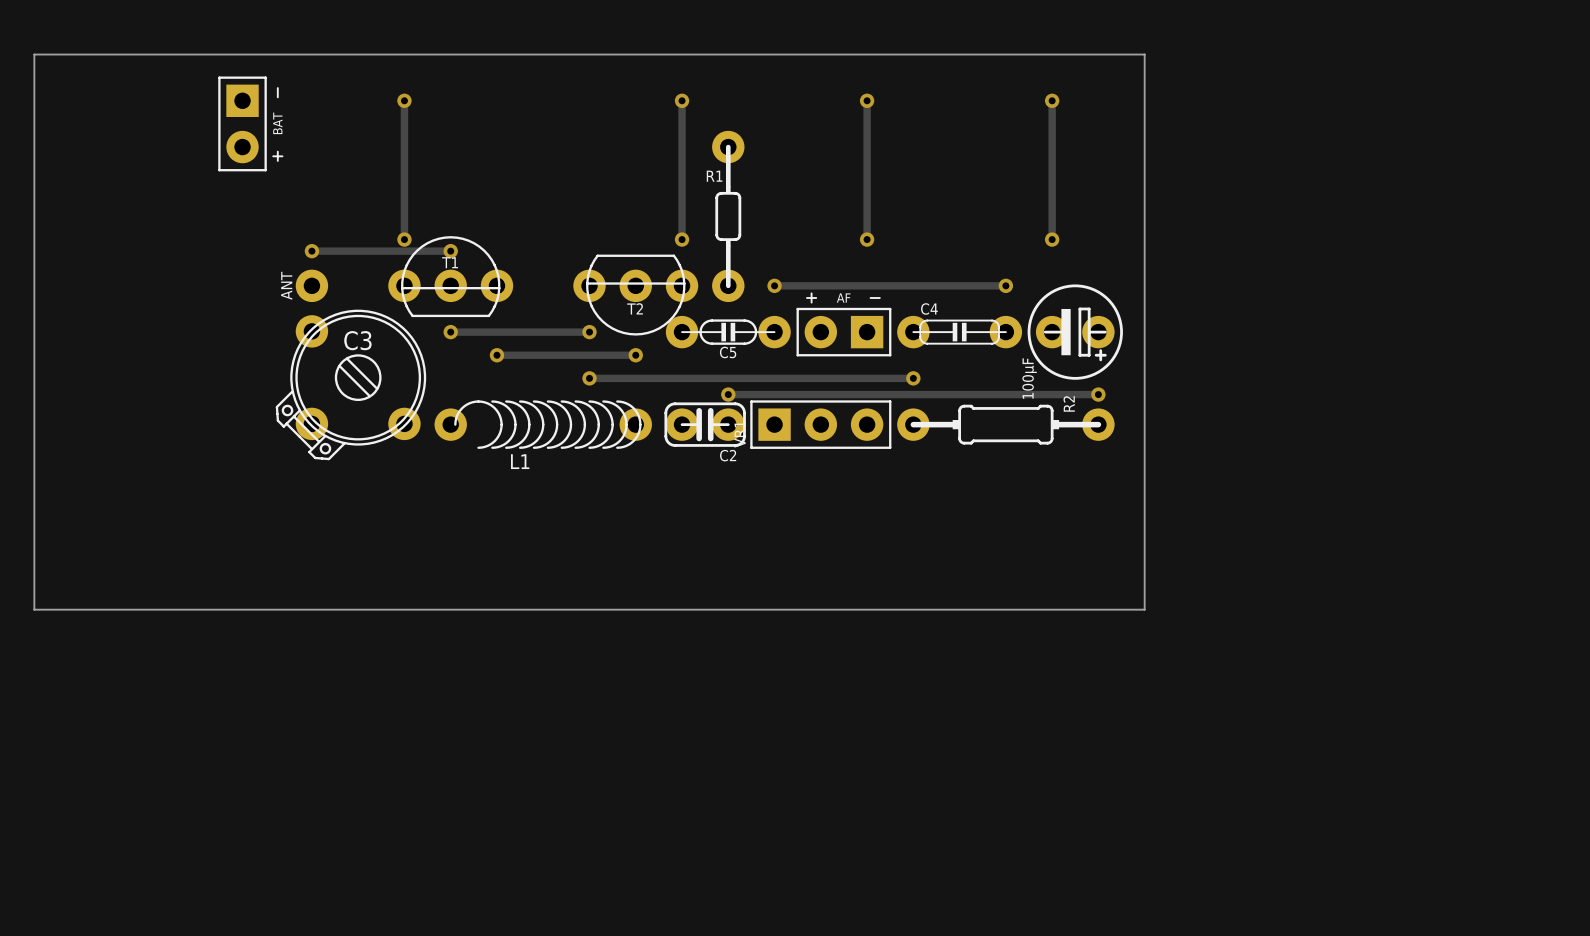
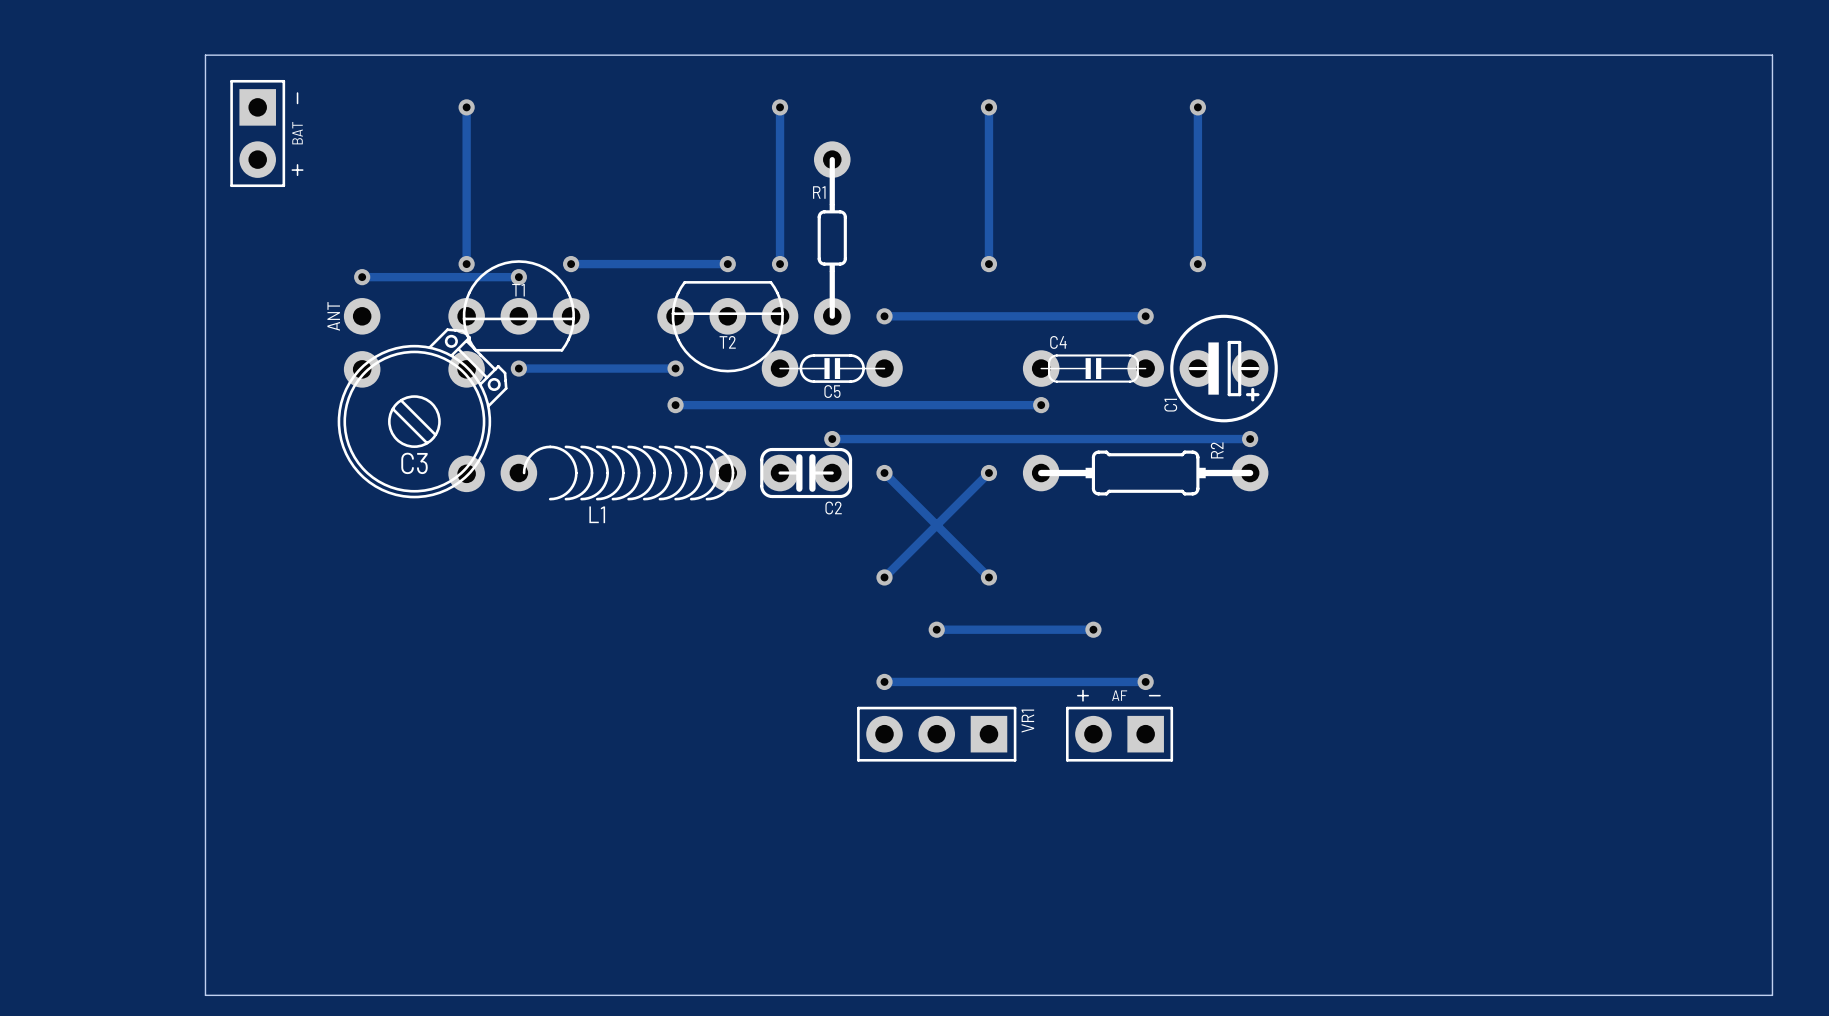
board edge: (173, 54) (34, 54) (34, 609) (1144, 609) (1144, 54) -> (205, 55) (205, 995) (1772, 995) (1772, 55) (1302, 55)
BAT position: (250, 123) -> (266, 133)
via: none -> (571, 264)
via: none -> (727, 264)
AF position: (843, 324) -> (1119, 725)
track: (496, 355) (635, 355) -> (571, 264) (727, 264)
via: (496, 355) -> none
via: (635, 355) -> none
track: (589, 378) (913, 378) -> (675, 405) (1041, 405)
via position: (589, 378) -> (675, 405)
via position: (913, 378) -> (1041, 405)
100µF name: 100µF (1029, 378) -> C1 (1170, 405)
C3 rotation: 0° (350, 384) -> 180° (422, 413)
track: none -> (884, 473) (988, 577)
via: none -> (884, 473)
VR1 rotation: 0° (820, 424) -> 180° (936, 734)
VR1 position: (820, 424) -> (936, 734)
track: none -> (988, 473) (884, 577)
via: none -> (988, 473)
via: none -> (884, 577)
via: none -> (988, 577)
track: none -> (936, 629) (1093, 629)
via: none -> (936, 629)
via: none -> (1093, 629)
track: none -> (884, 681) (1145, 681)
via: none -> (884, 681)
via: none -> (1145, 681)

